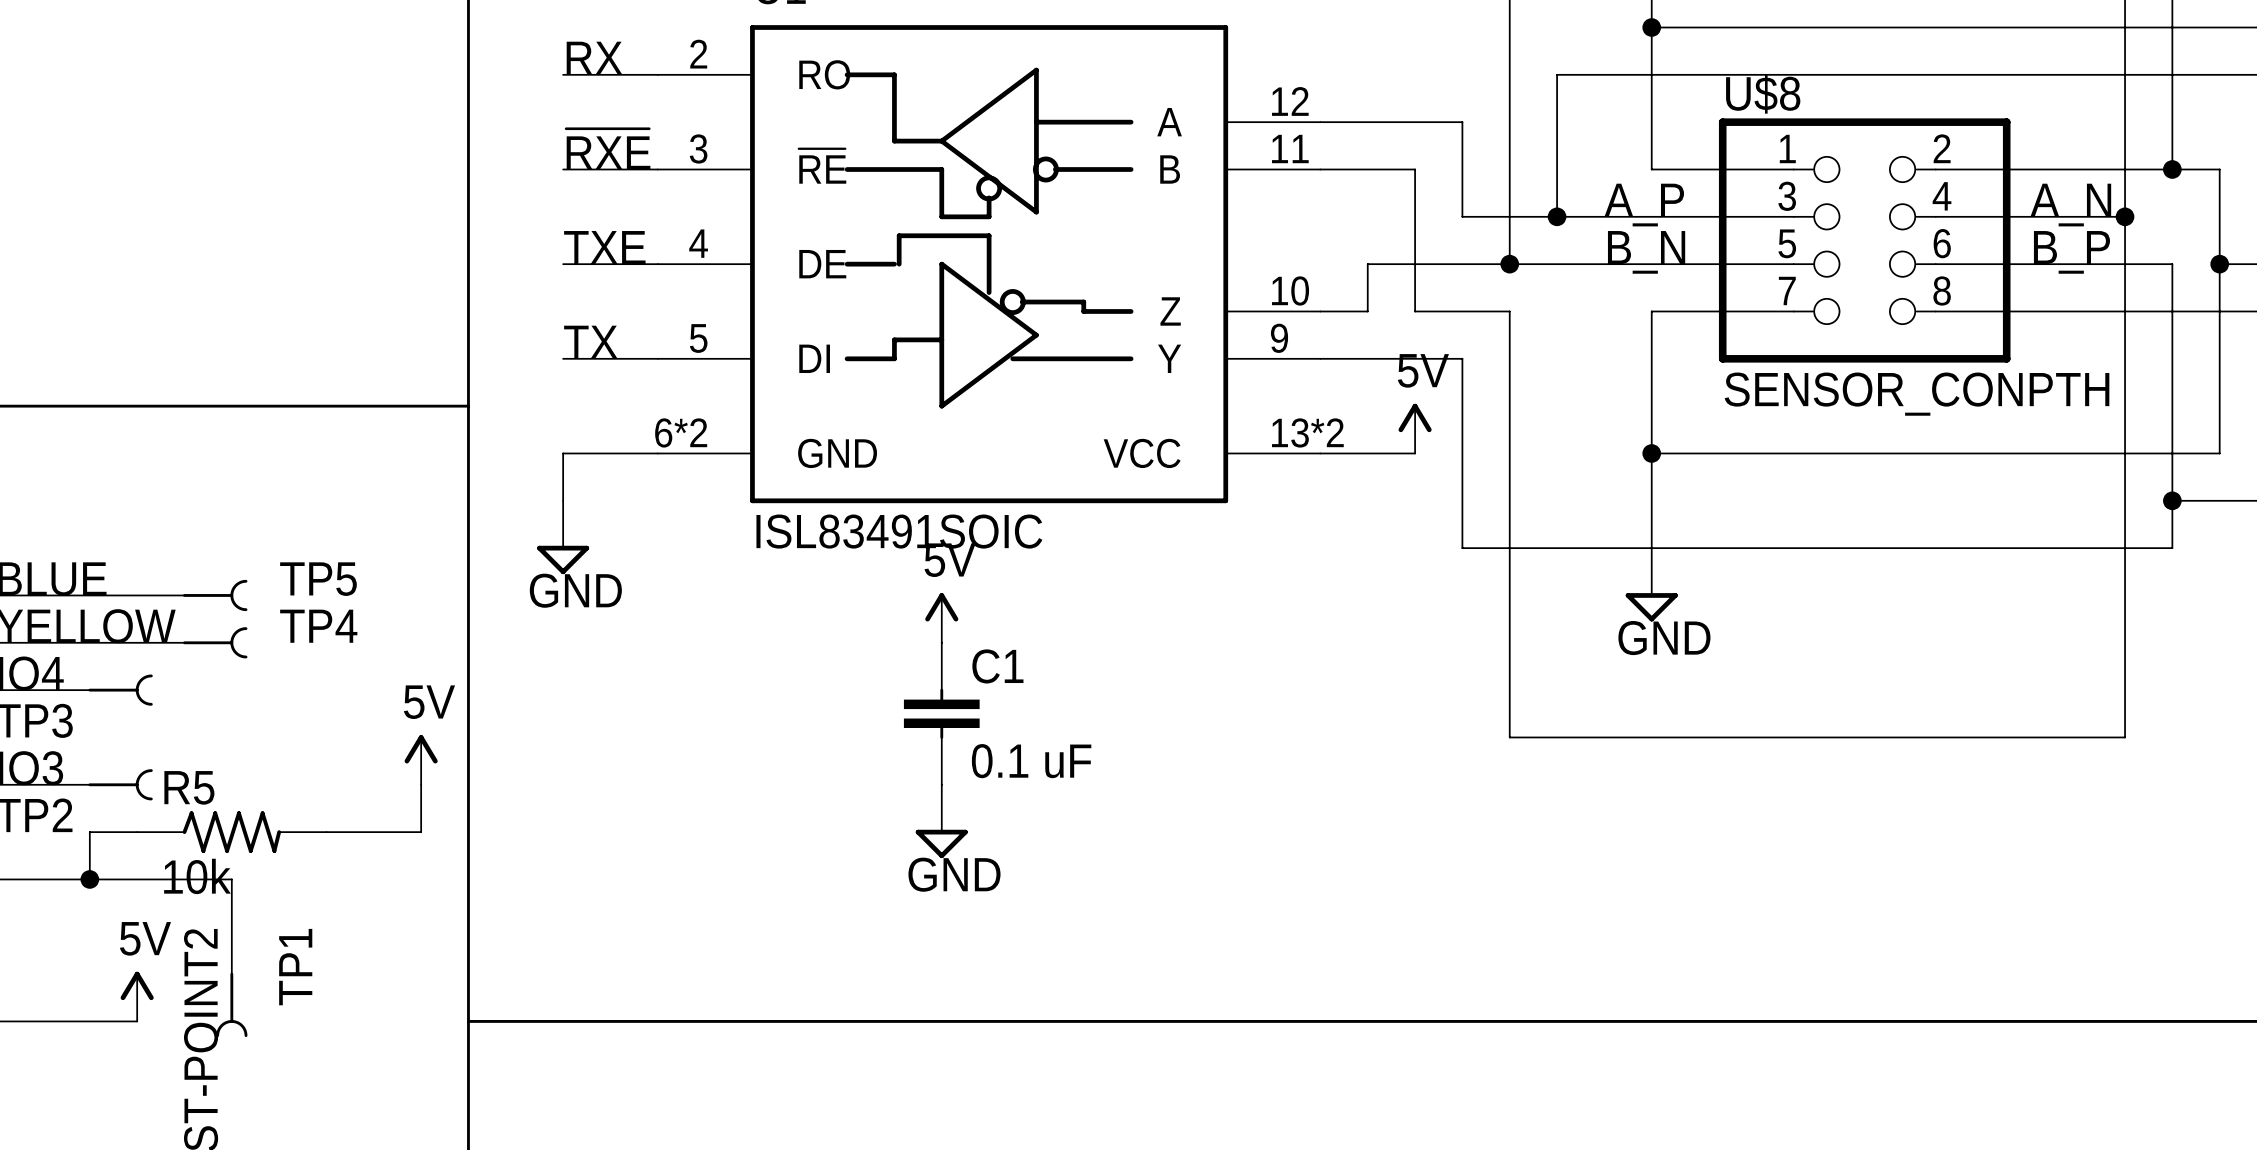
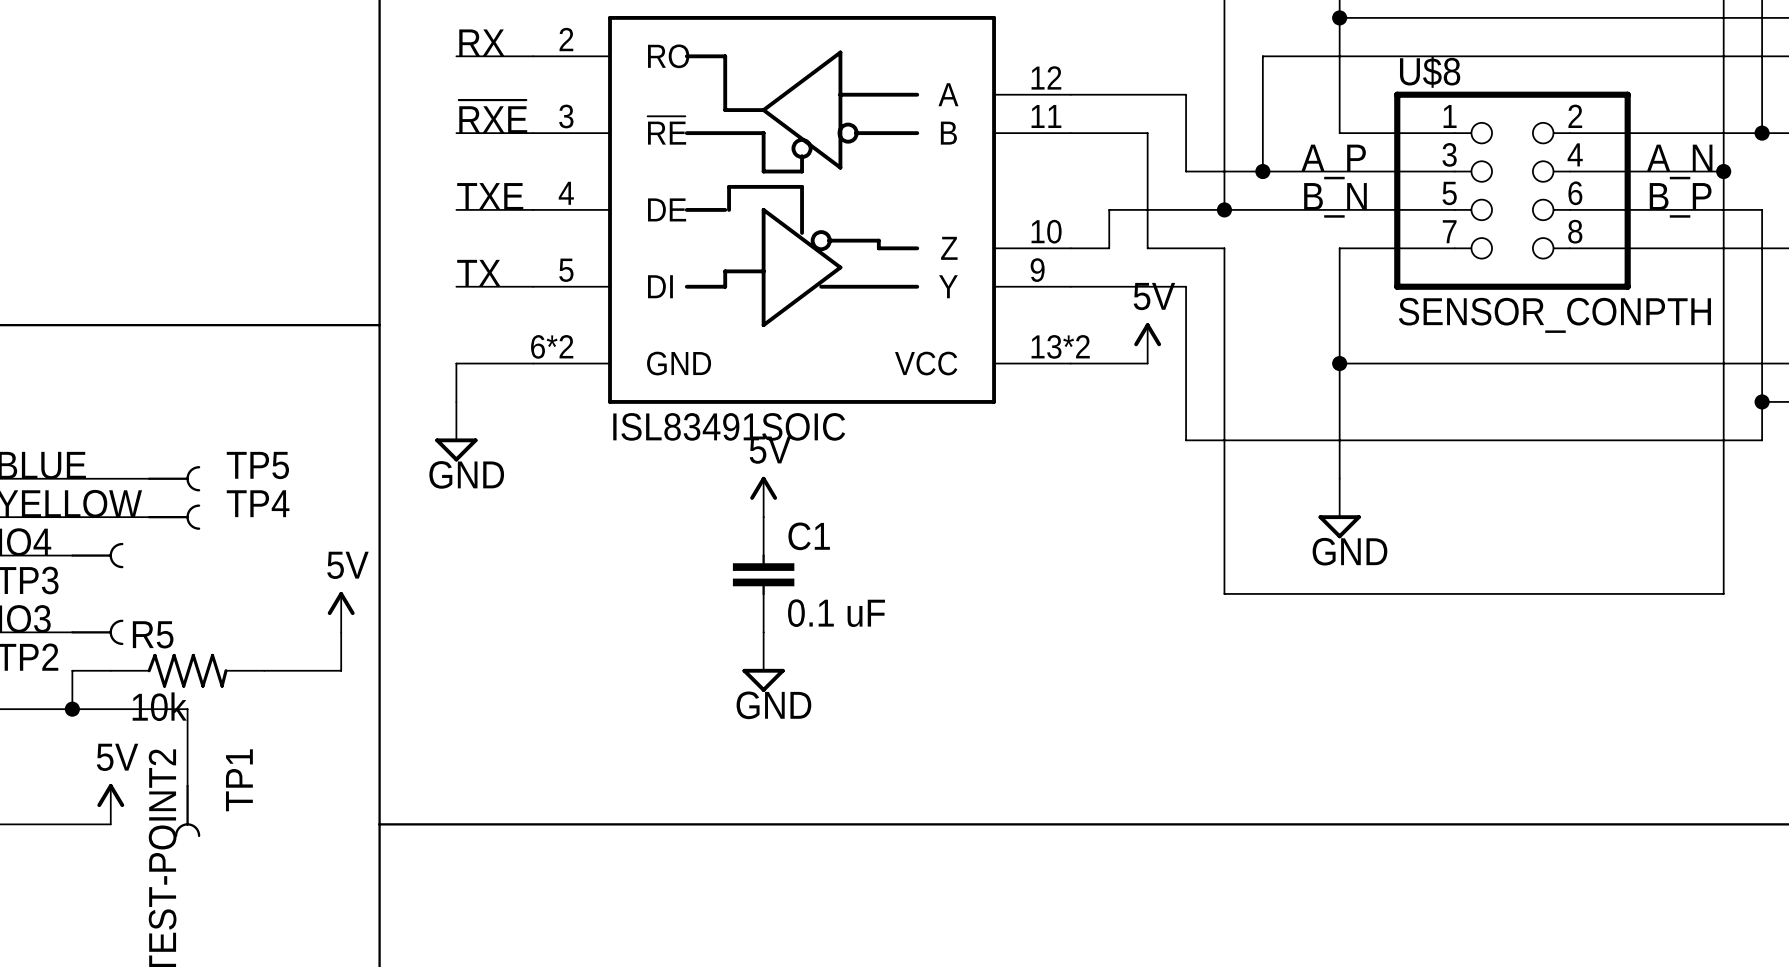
power symbol position: GND (1651, 584) -> GND (1339, 508)

